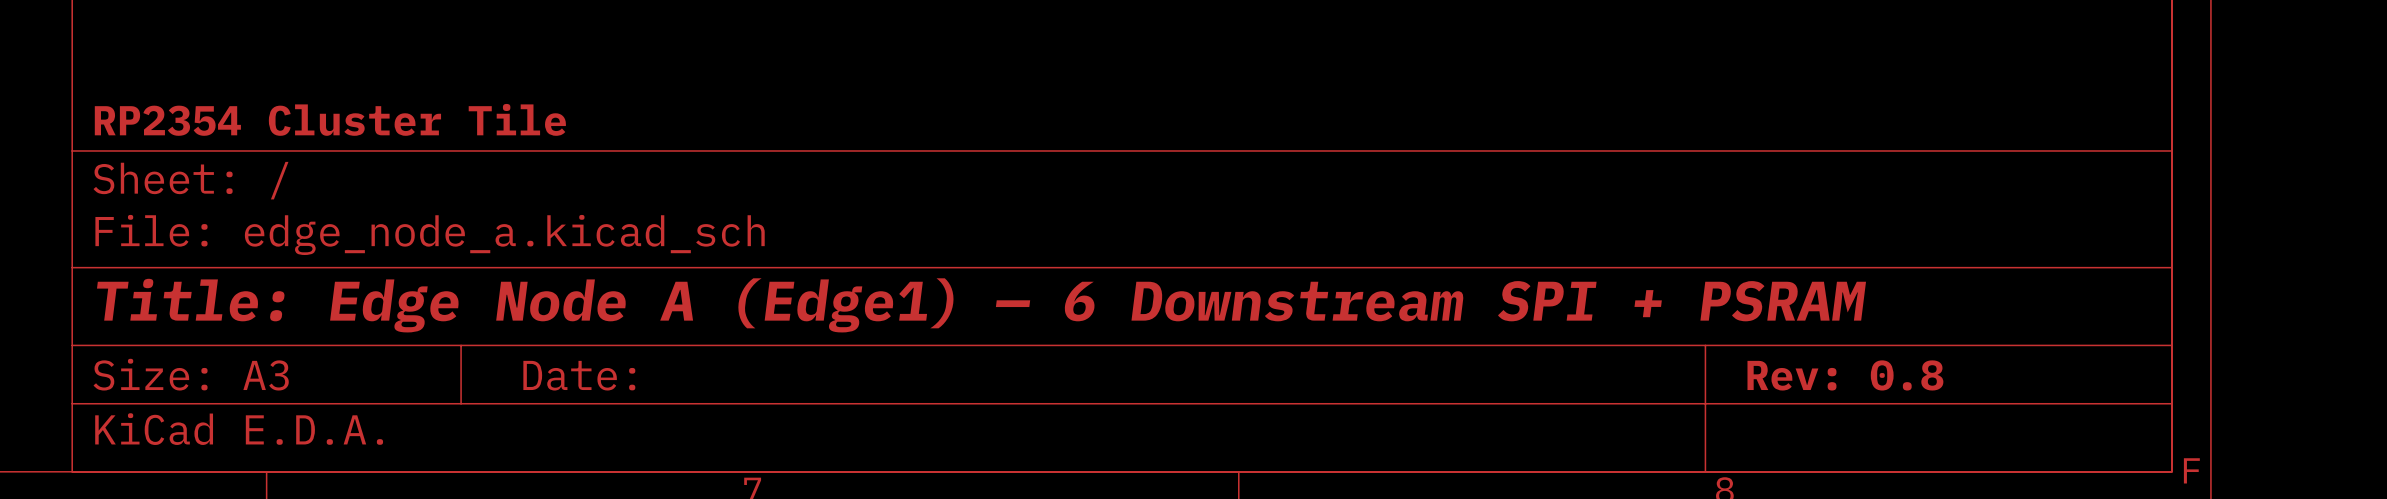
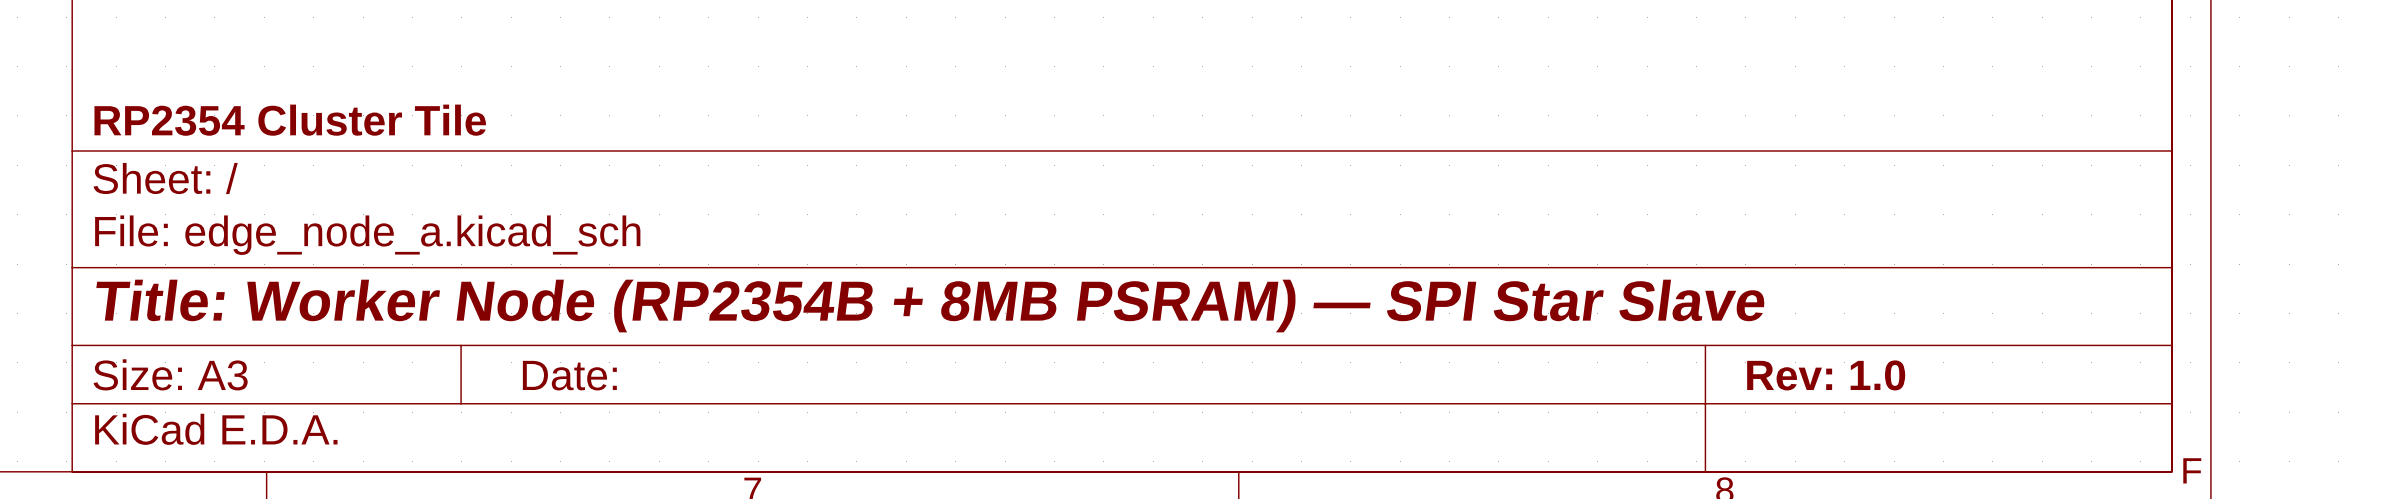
title block: Title: Edge Node A (Edge1) — 6 Downstream SPI + PSRAM (981, 305) -> Title: Worker Node (RP2354B + 8MB PSRAM) — SPI Star Slave (930, 306)
title block: Rev: 0.8 (1845, 375) -> Rev: 1.0 (1826, 375)

